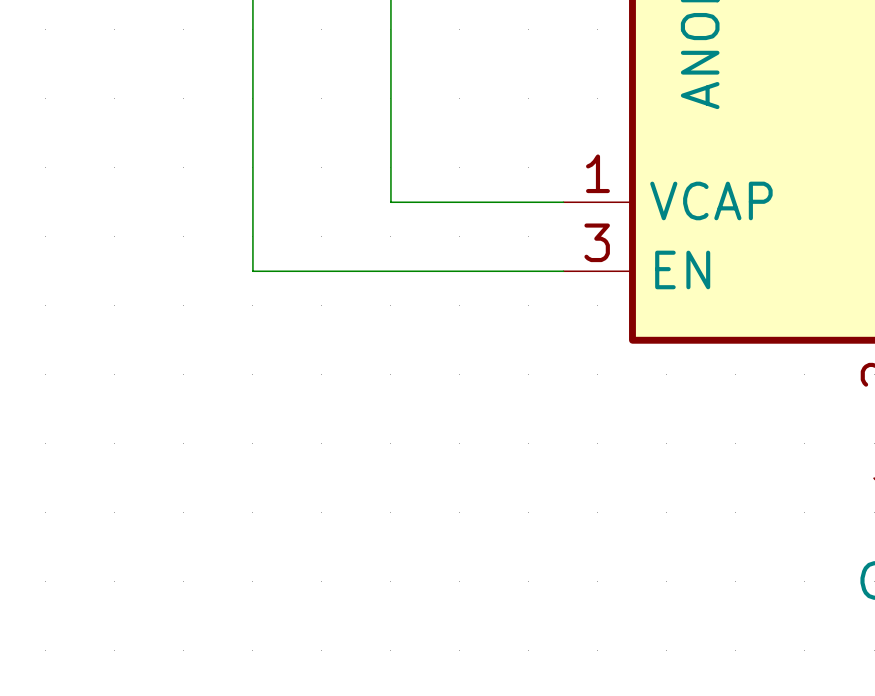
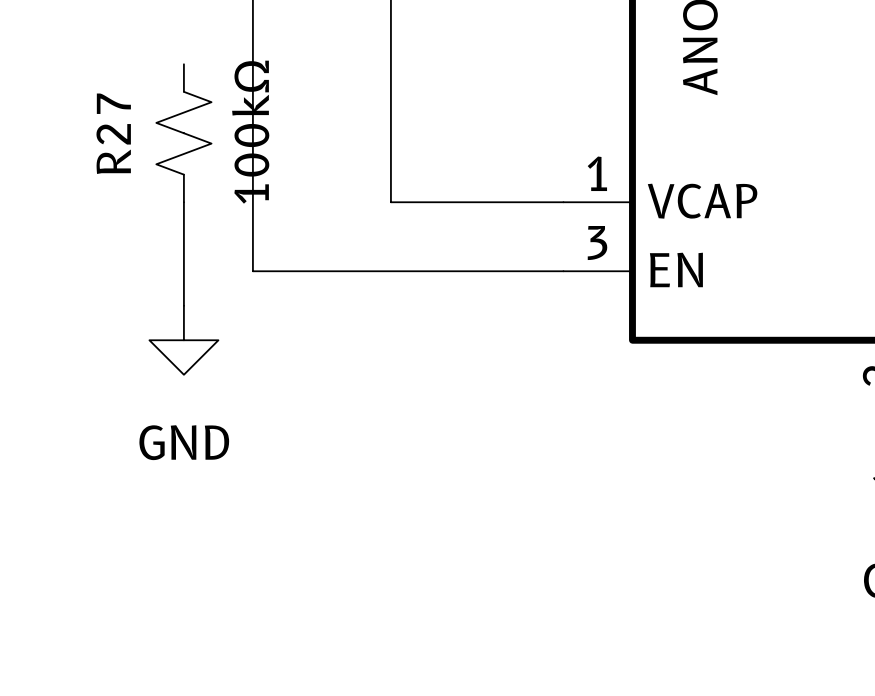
R27: none -> 100kΩ (183, 133)
wire: none -> (183, 202) (183, 305)
power symbol: none -> GND (183, 340)

